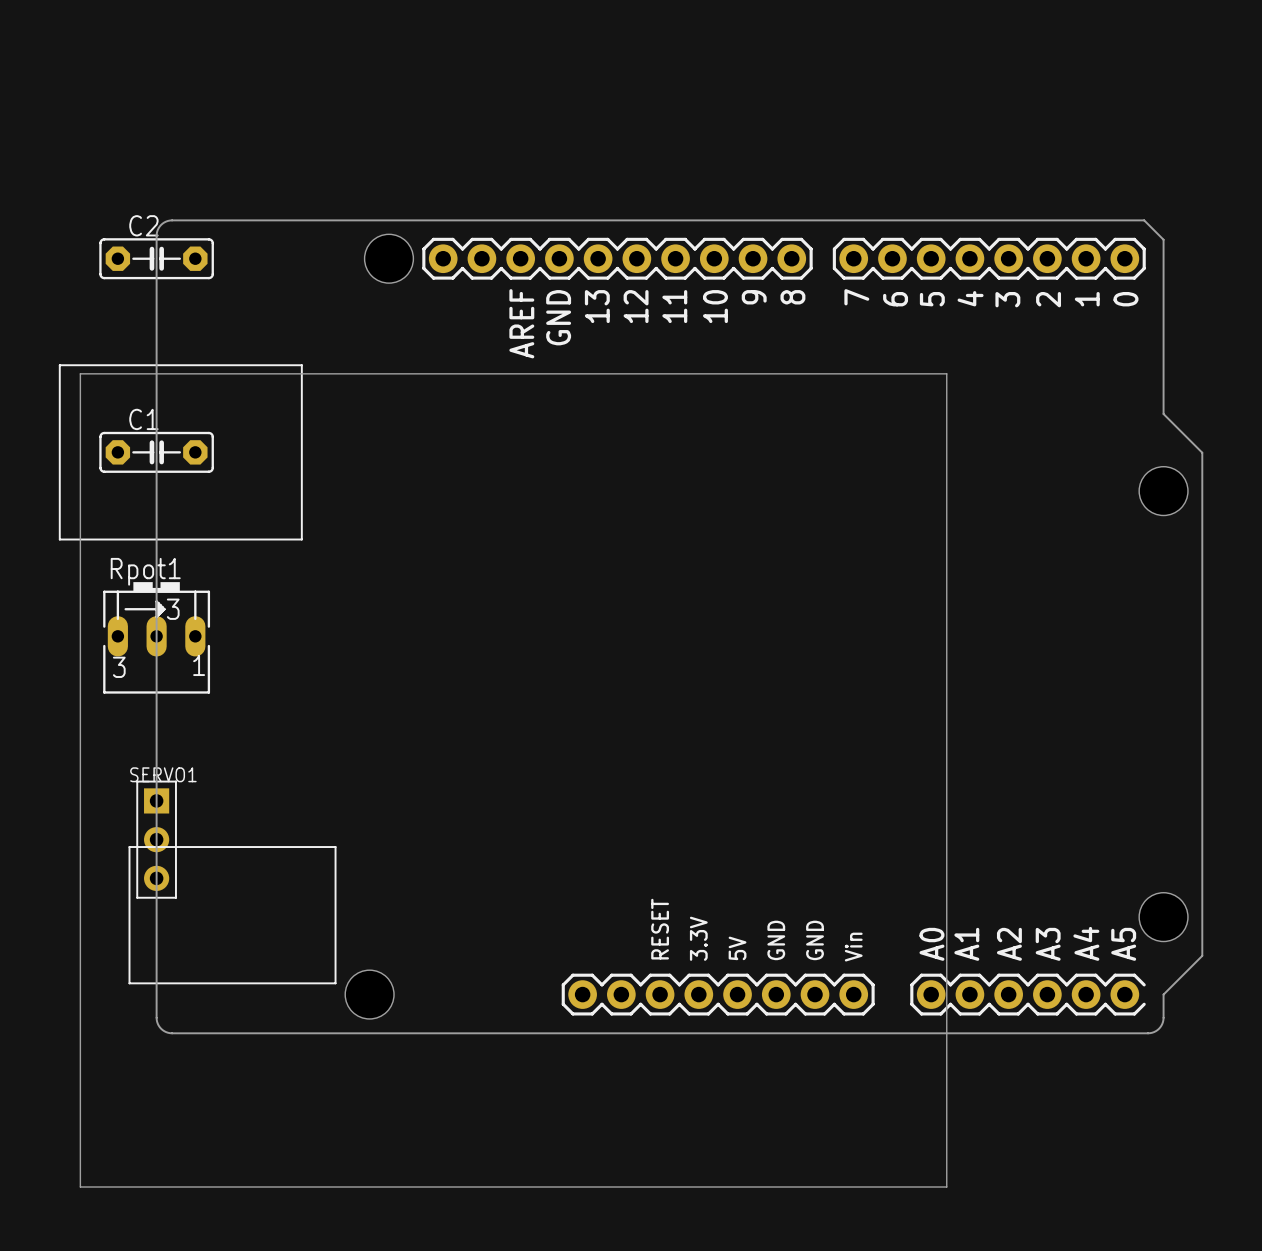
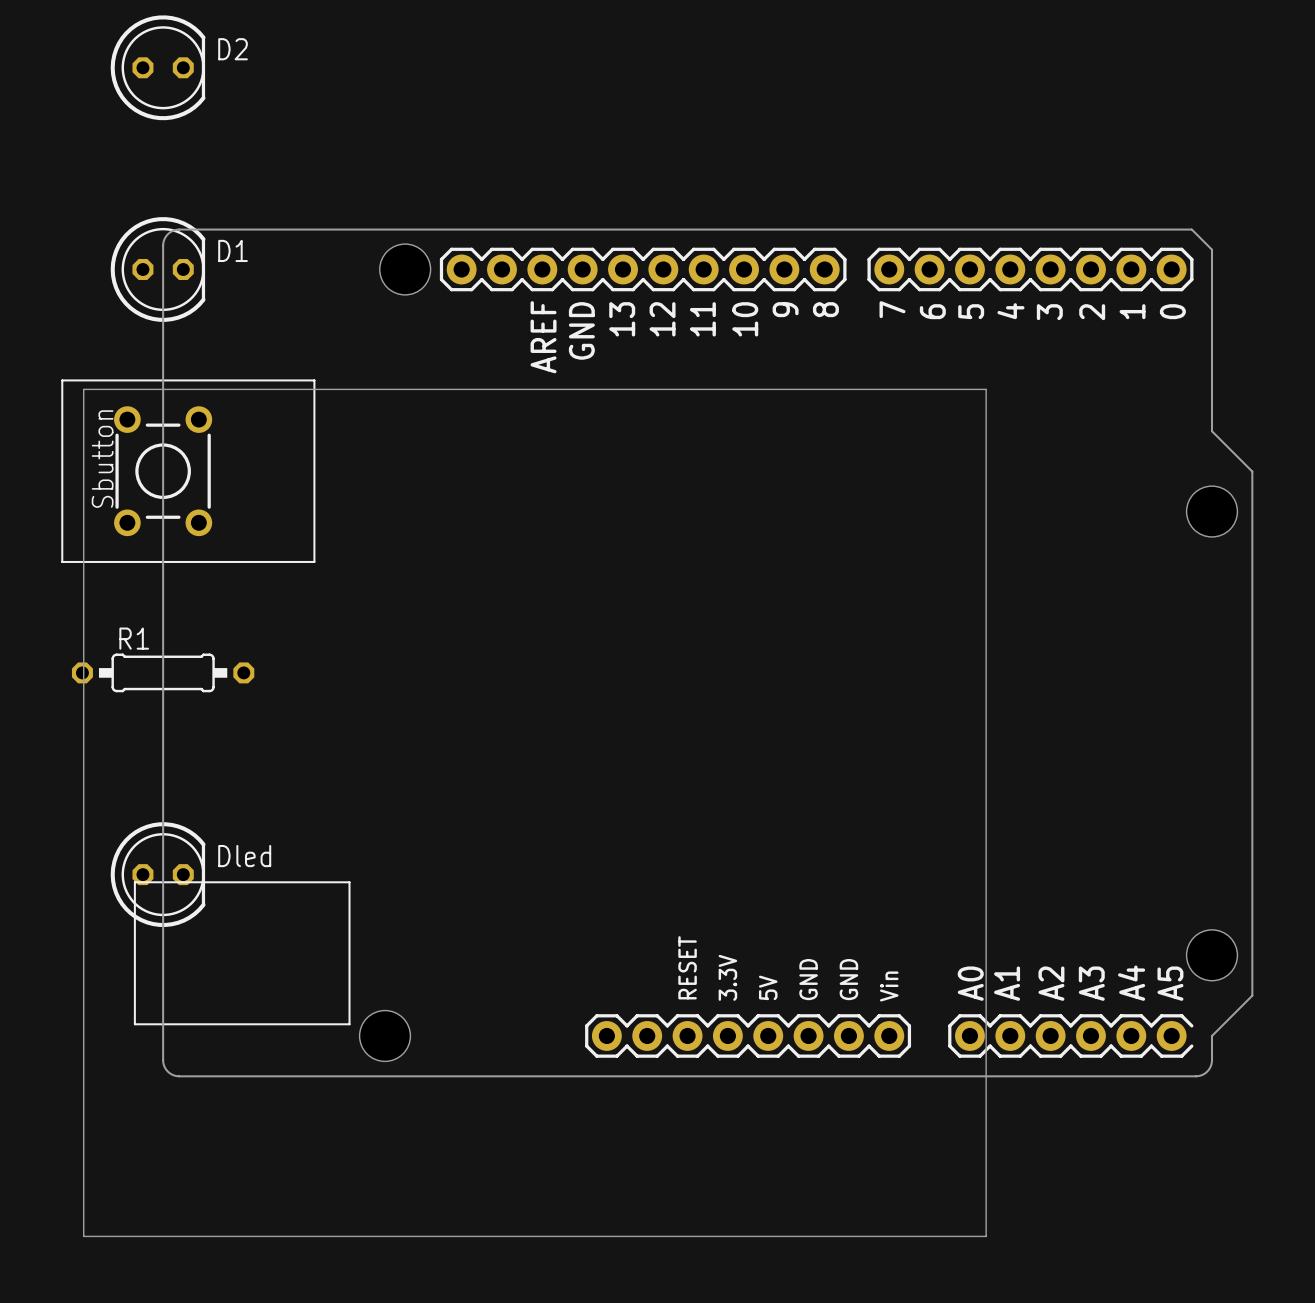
D2: none -> (158, 67)
D1: none -> (158, 269)
C2: (156, 258) -> none
C1: (156, 452) -> none
Sbutton: none -> (163, 471)
Rpot1: (156, 637) -> none
R1: none -> (163, 672)
Dled: none -> (158, 874)
SERVO1: (156, 839) -> none

